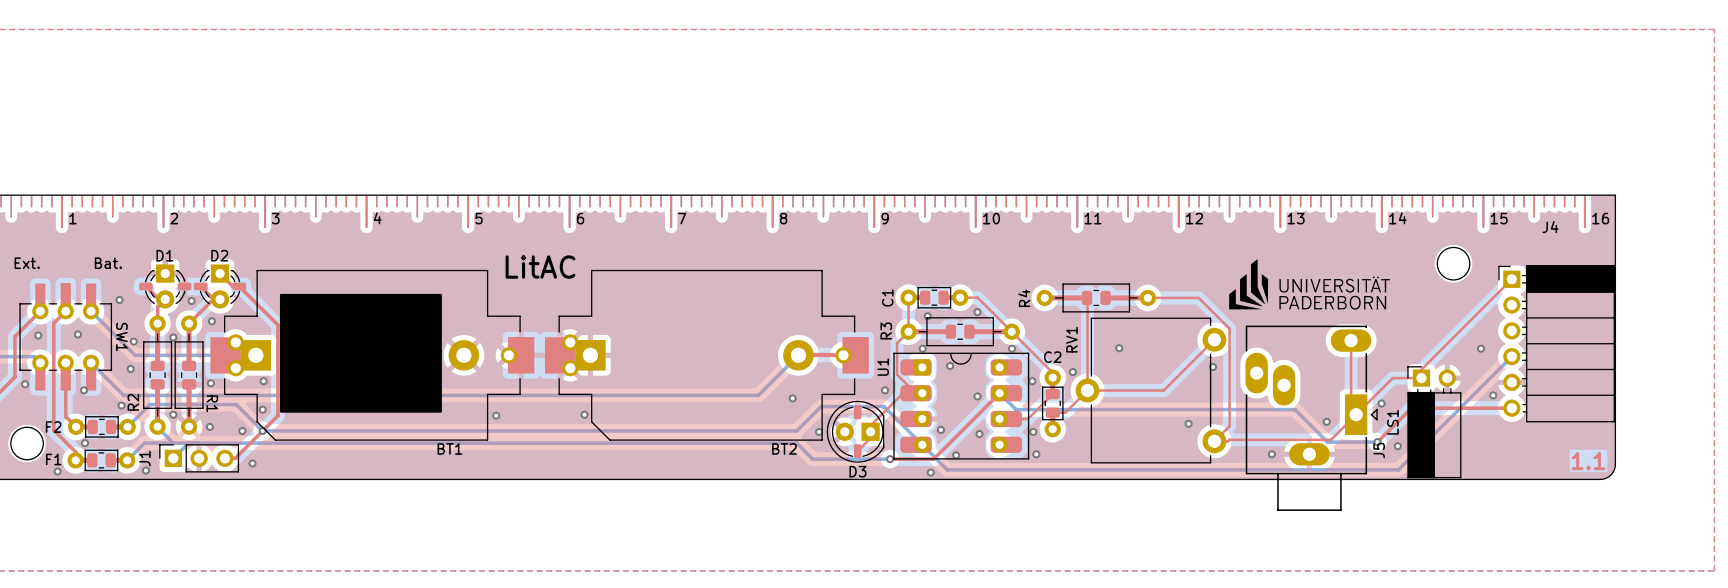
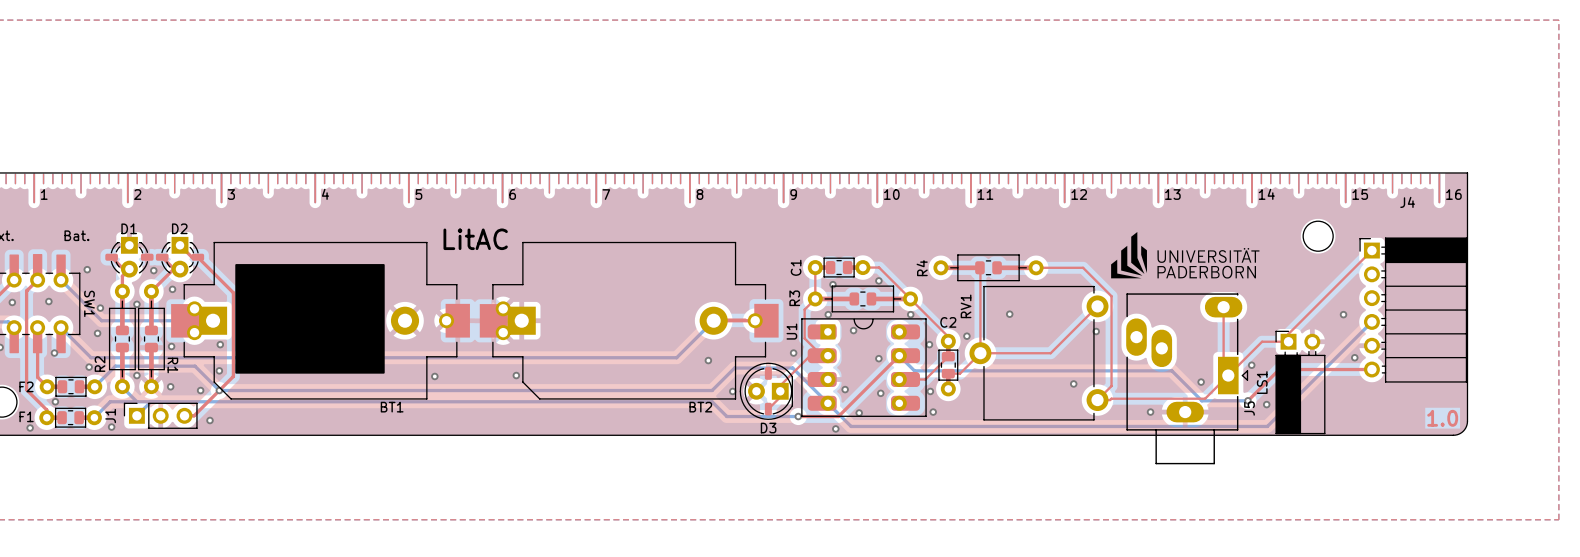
text: 1.1 (1588, 461) -> 1.0 (1442, 418)

